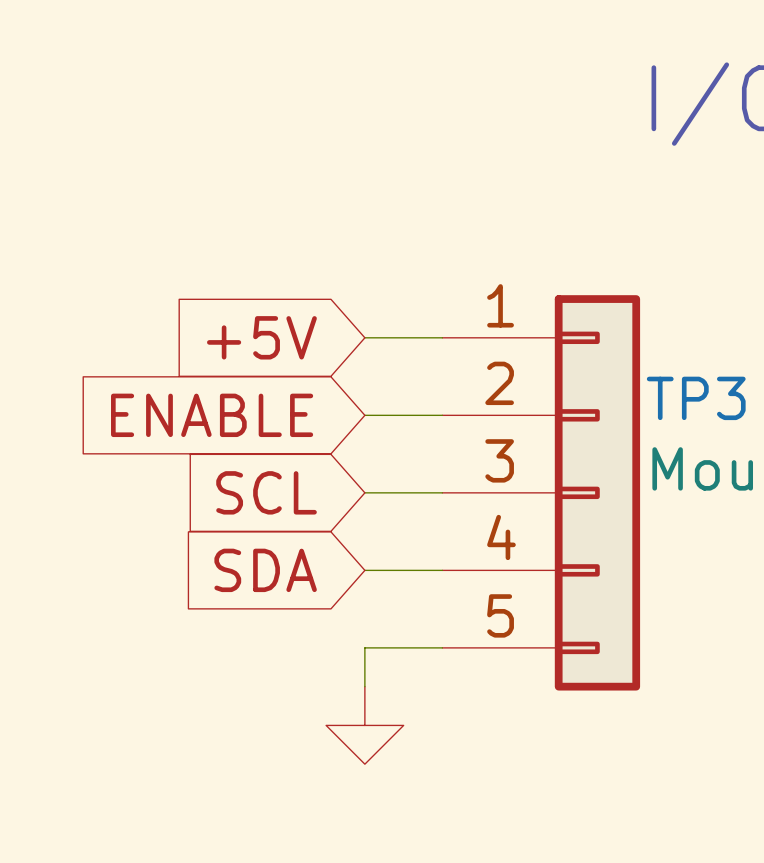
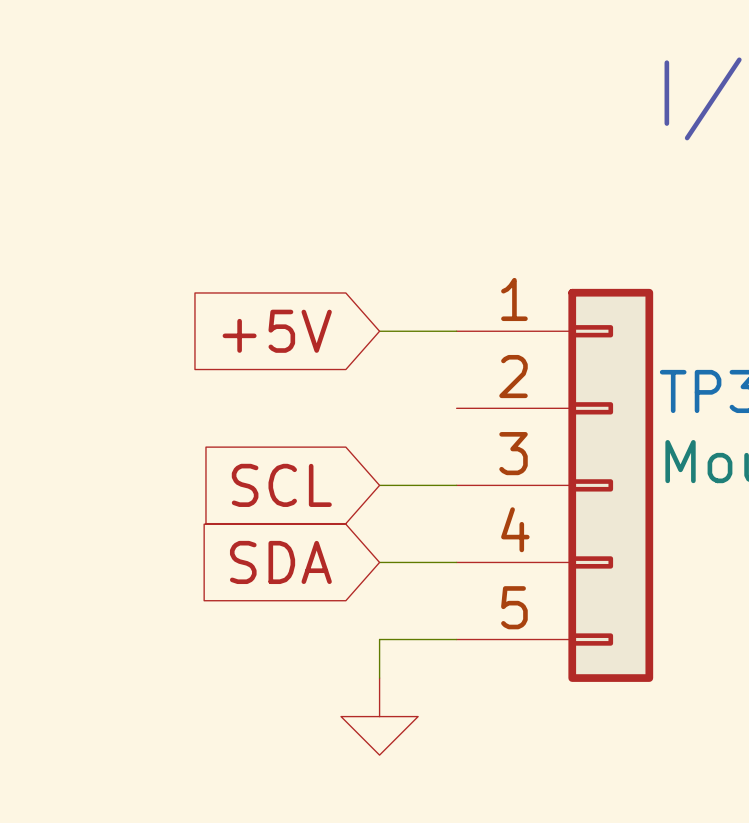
global label: ENABLE (212, 415) -> none
wire: (364, 415) (442, 415) -> none

